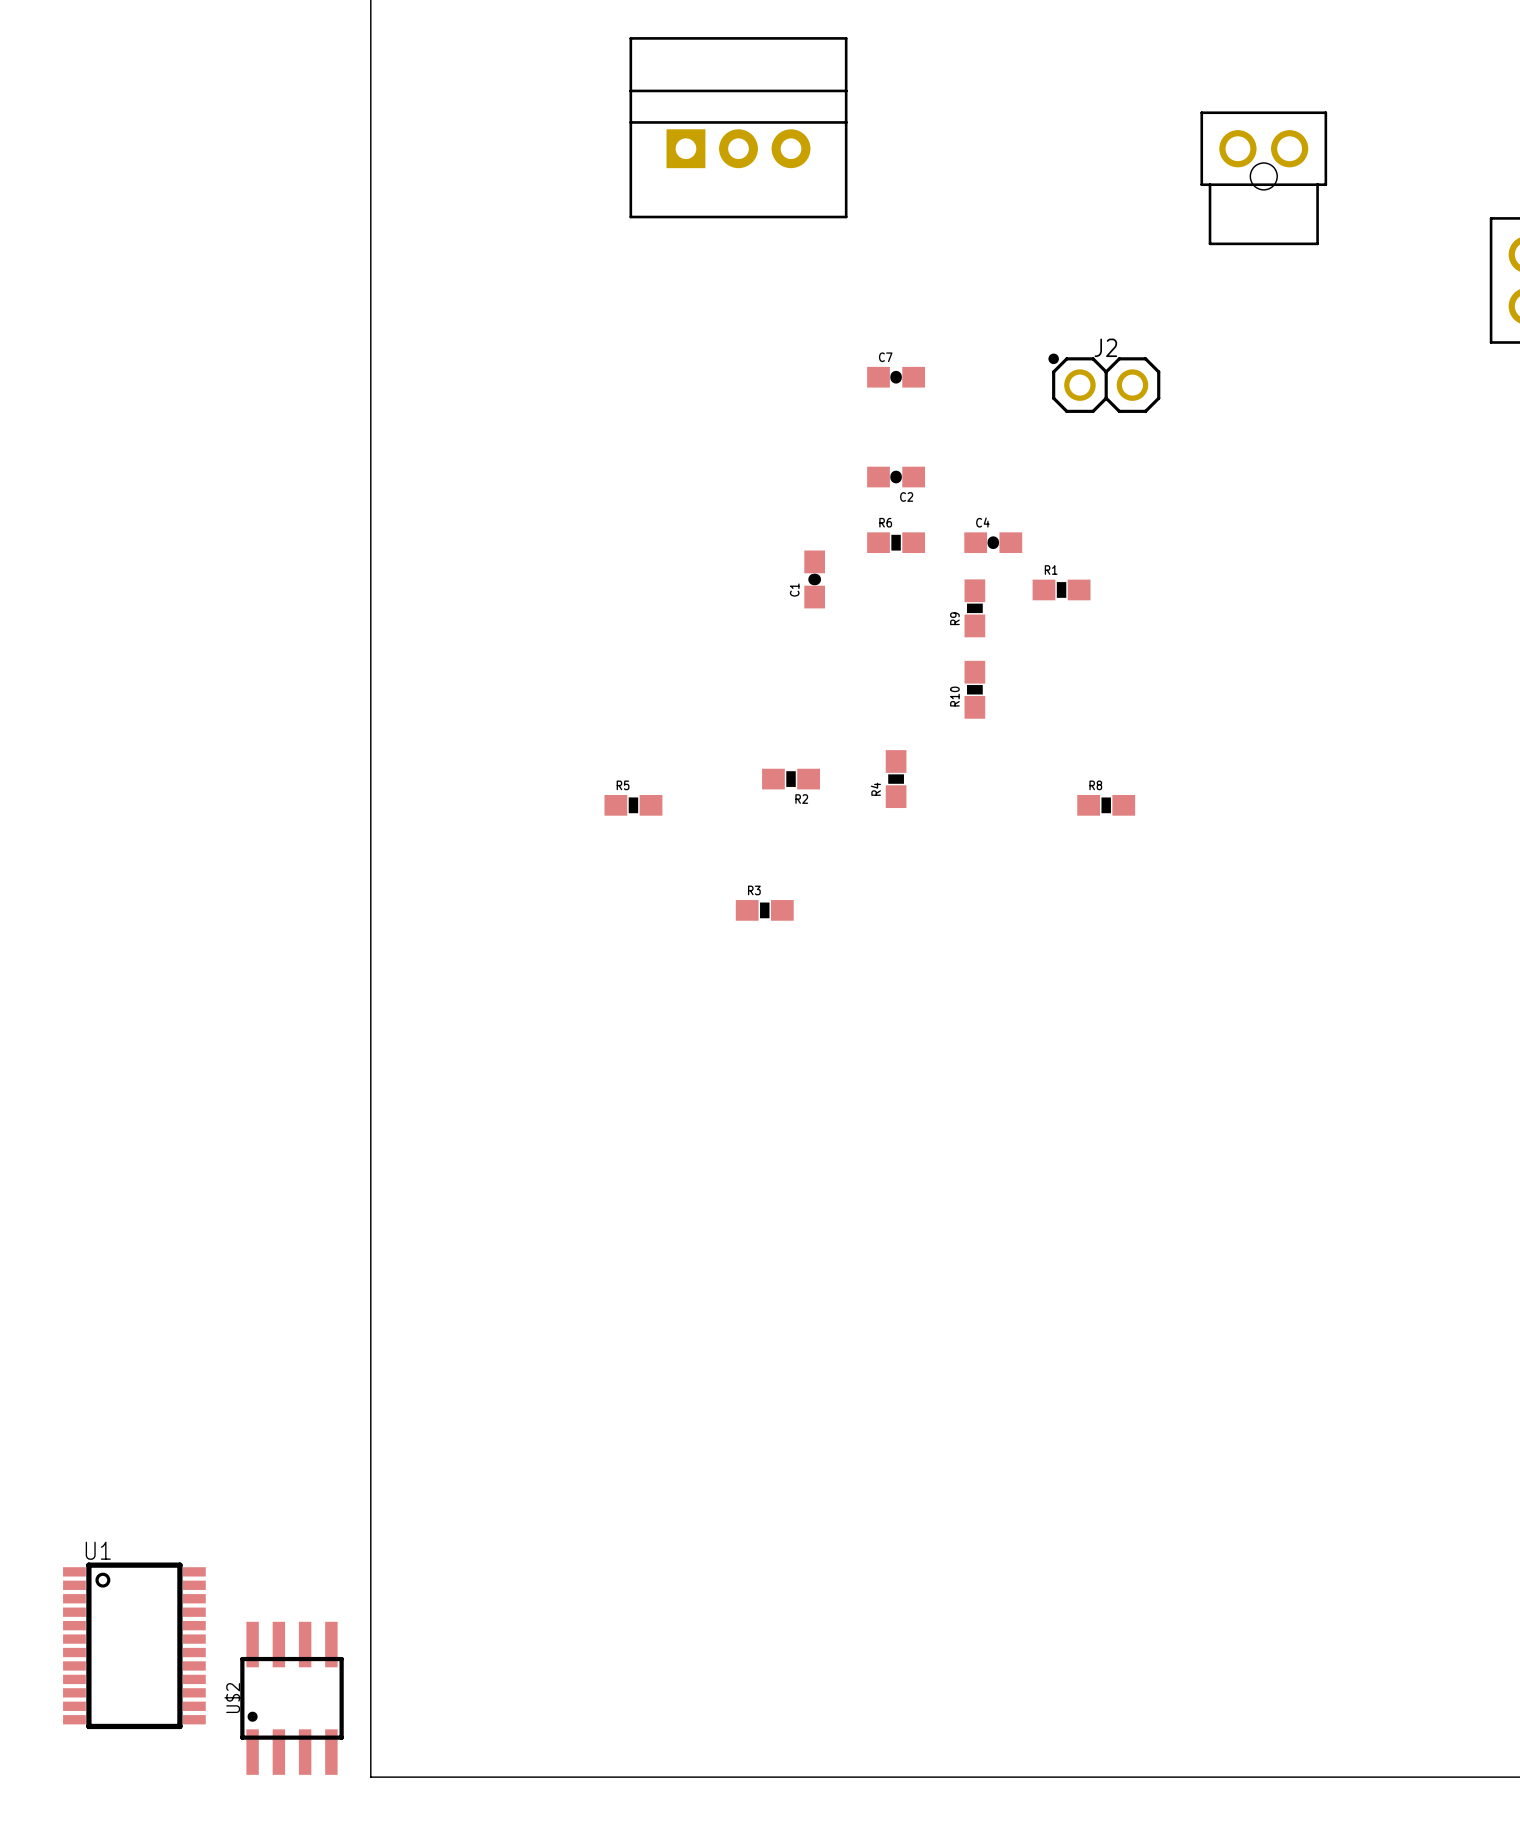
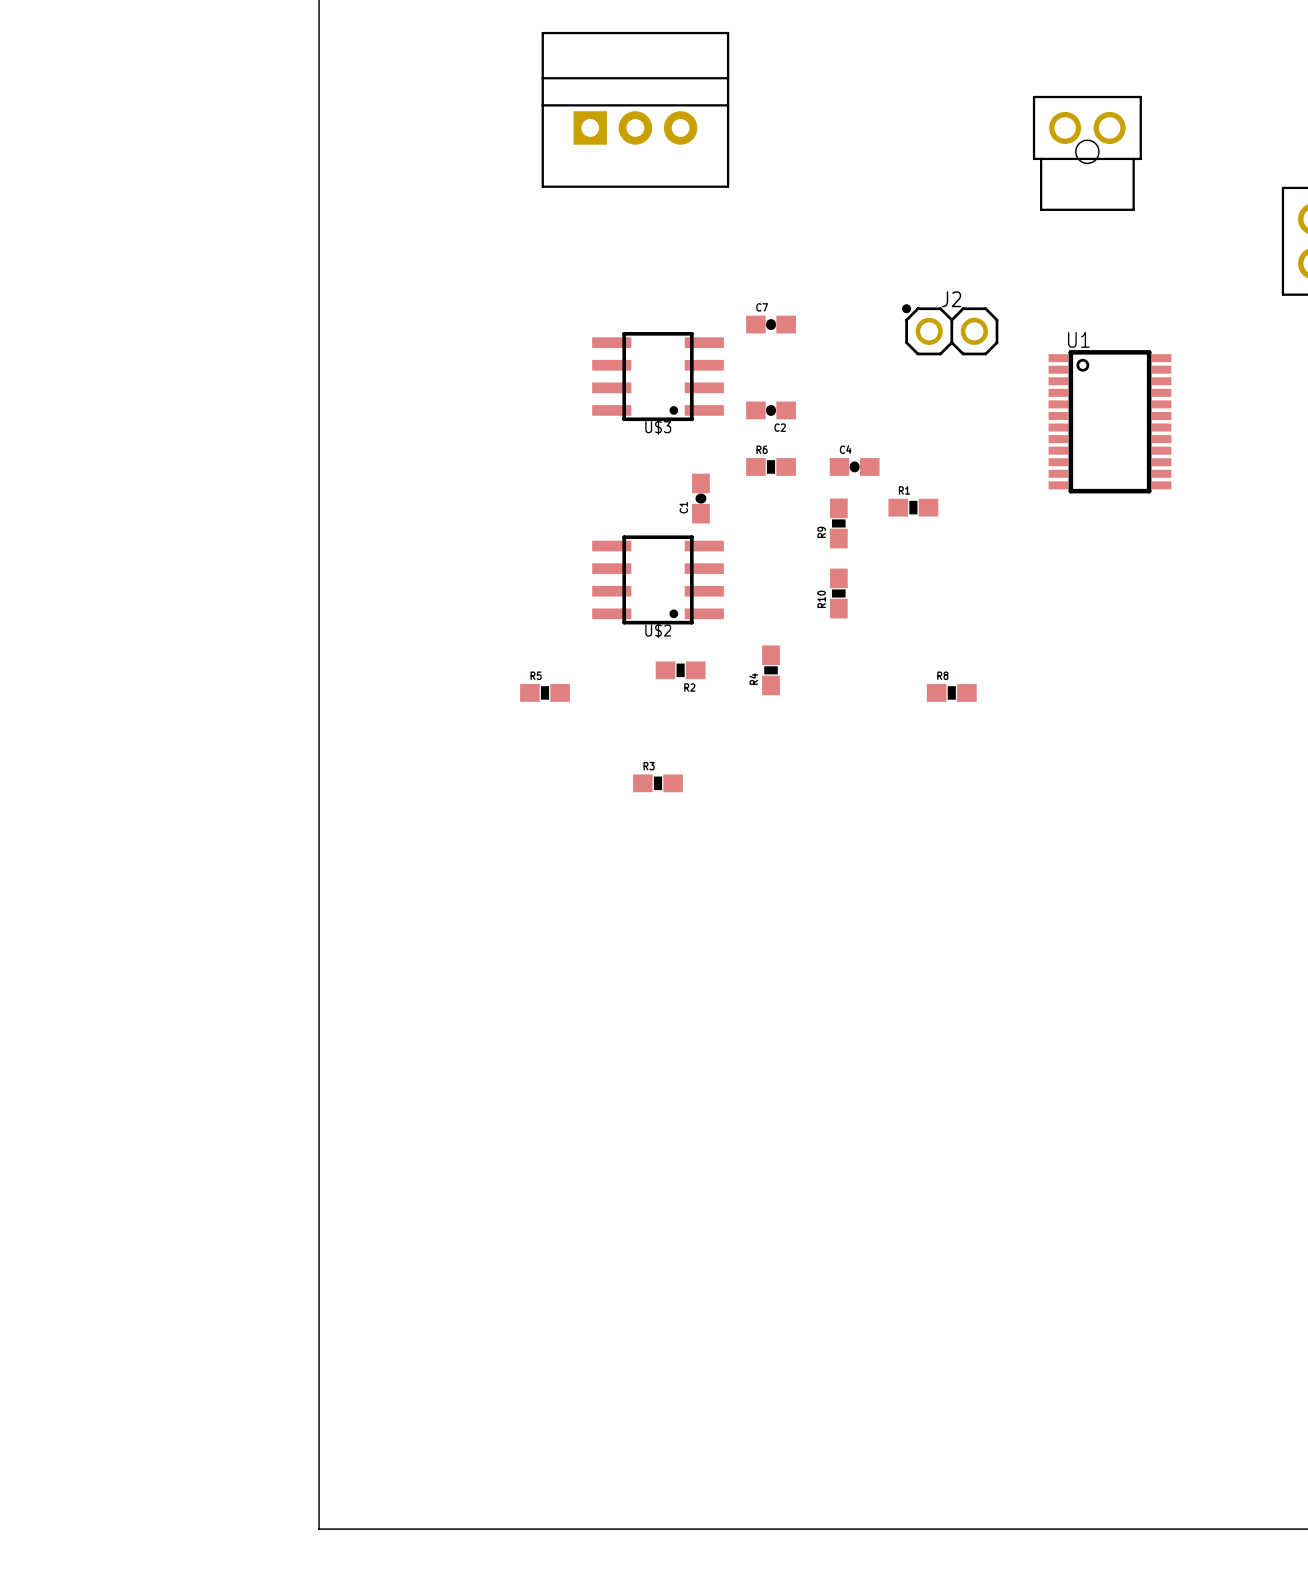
U$3: none -> (658, 376)
U1 position: (134, 1645) -> (1109, 421)
U$2 rotation: 0° (292, 1698) -> 90° counterclockwise (658, 579)
U$2 position: (292, 1698) -> (658, 579)

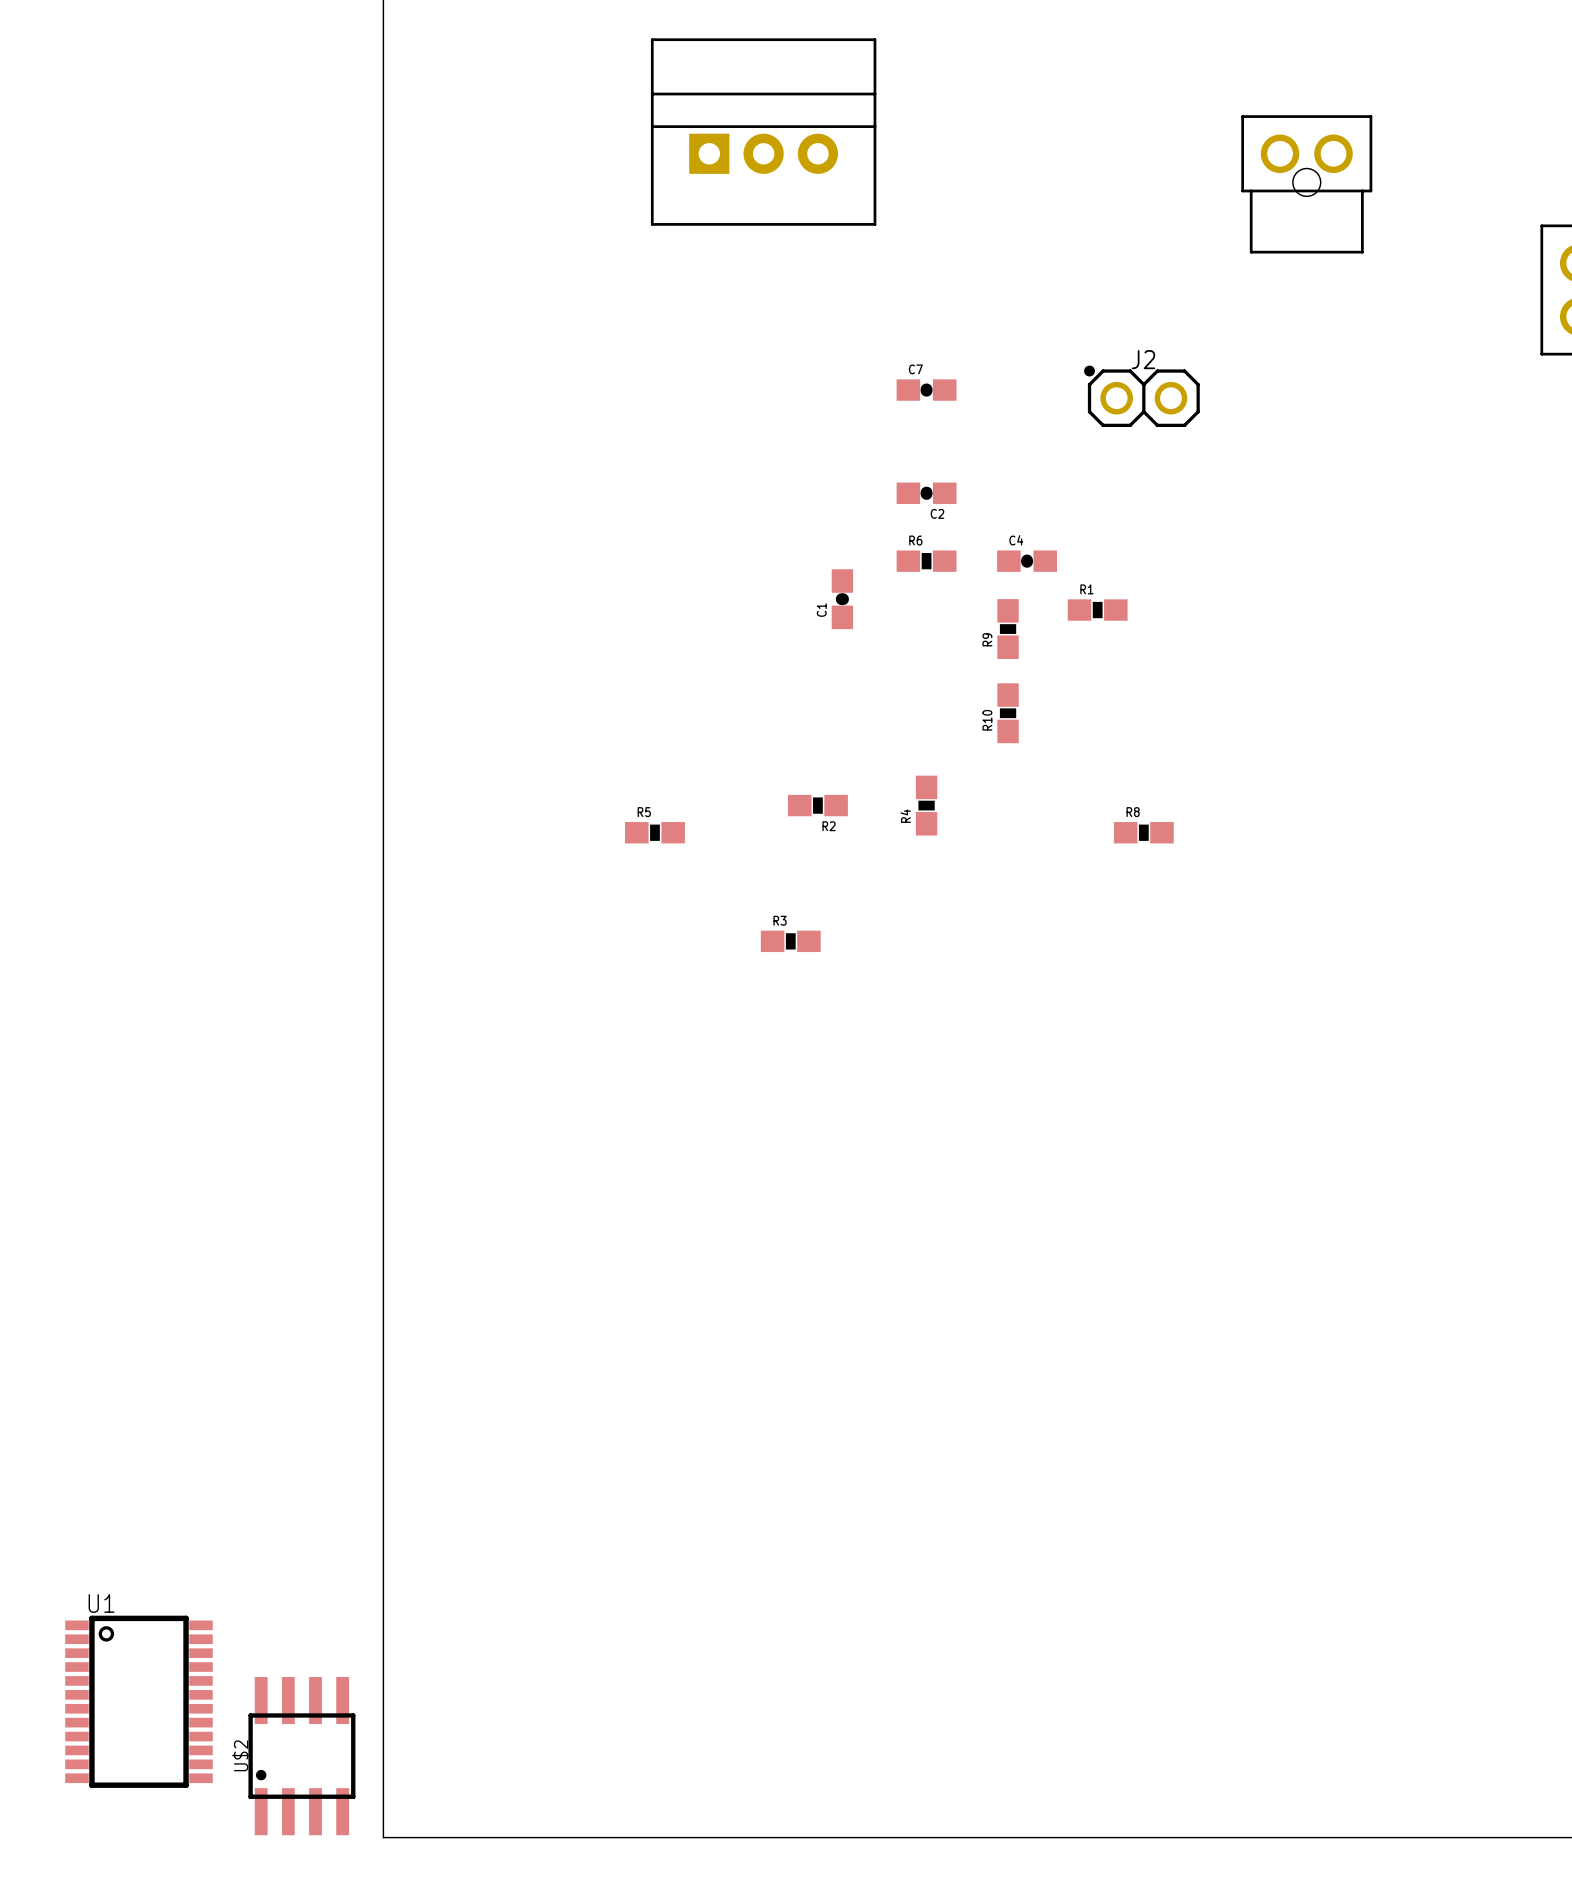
U$3: (658, 376) -> none
U1 position: (1109, 421) -> (138, 1701)
U$2 rotation: 0° (658, 579) -> 90° clockwise (301, 1756)
U$2 position: (658, 579) -> (301, 1756)

